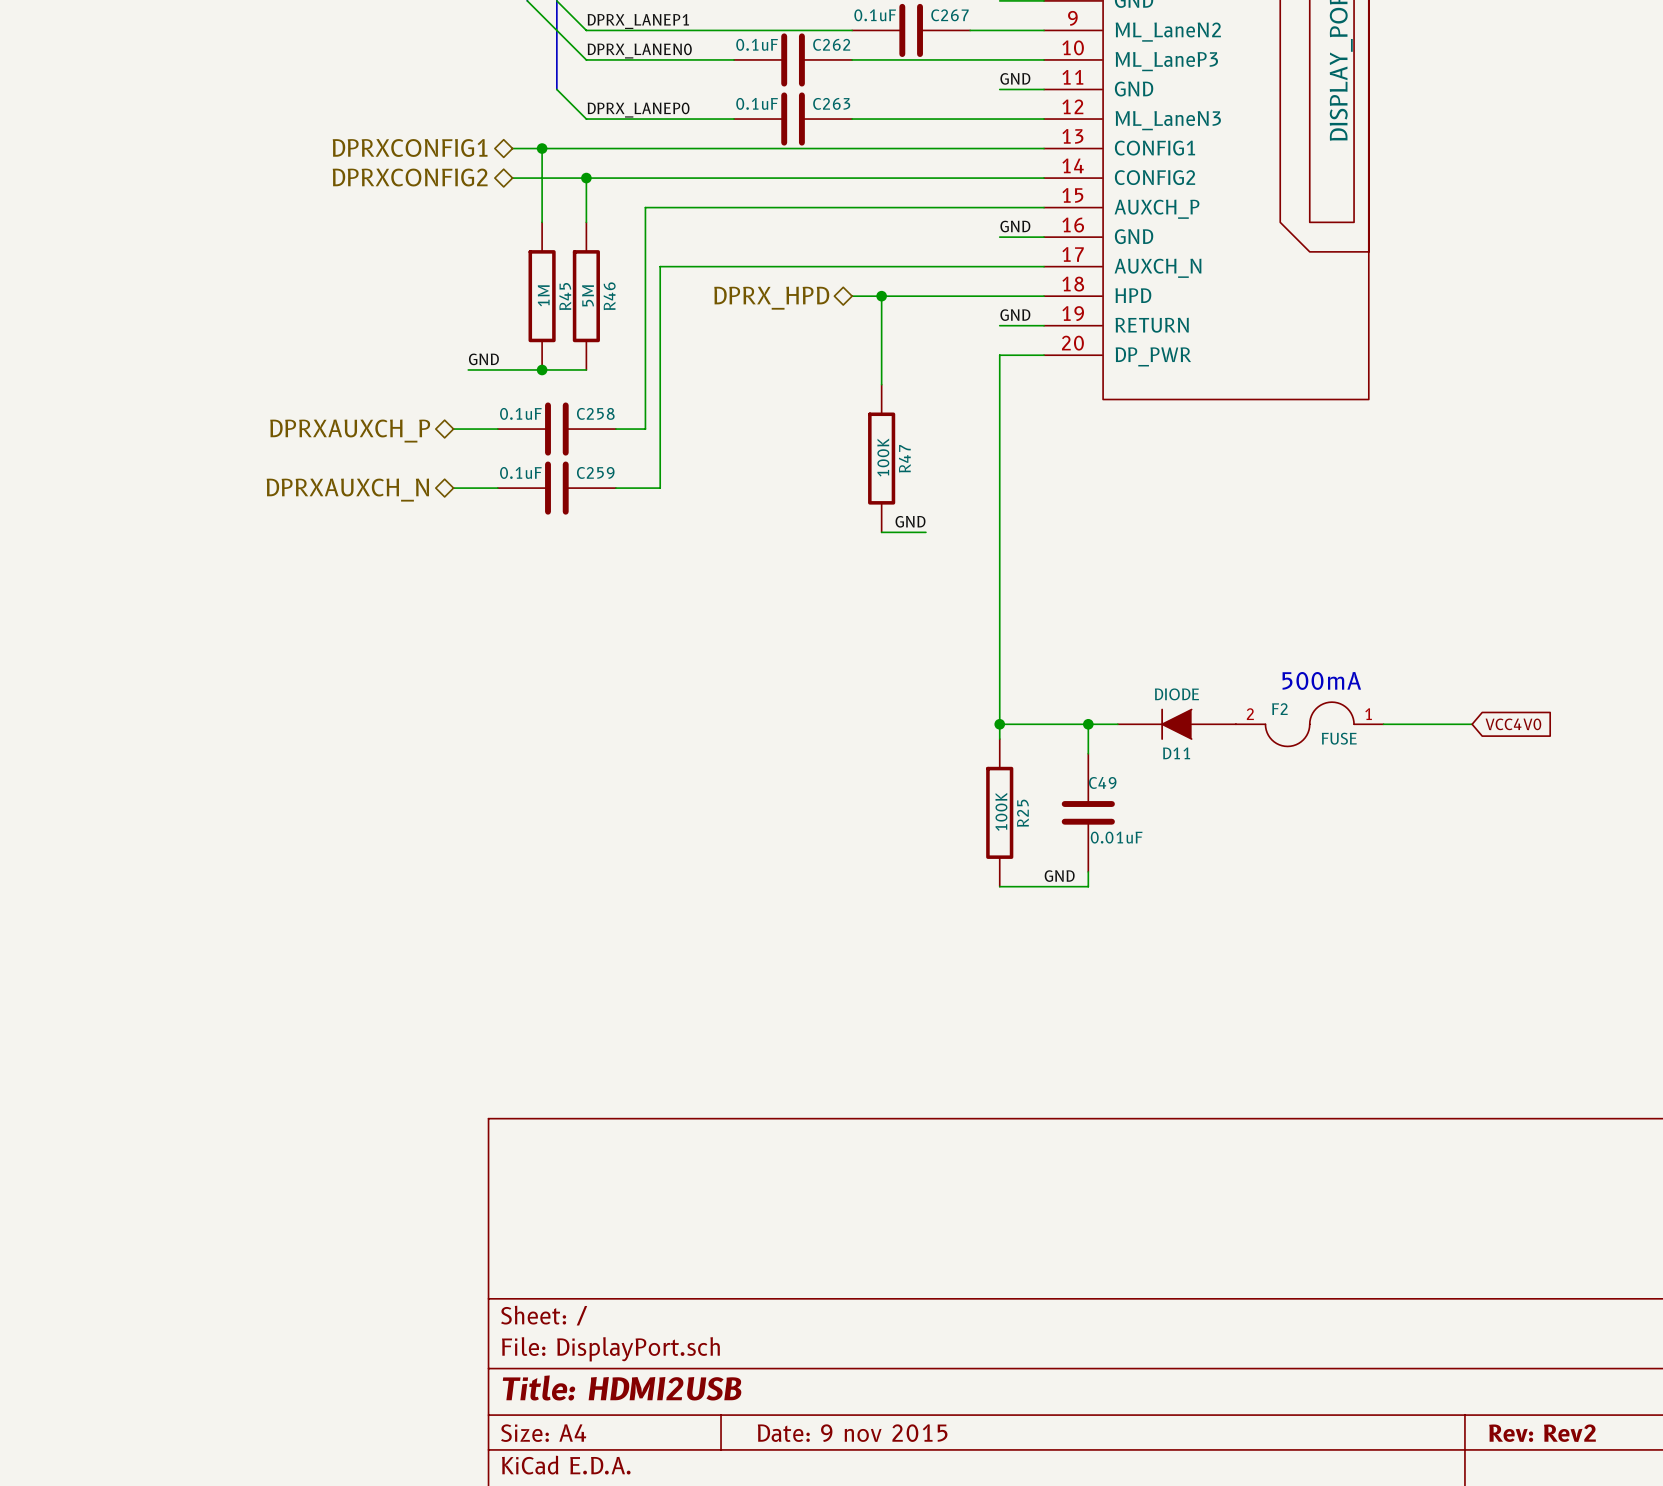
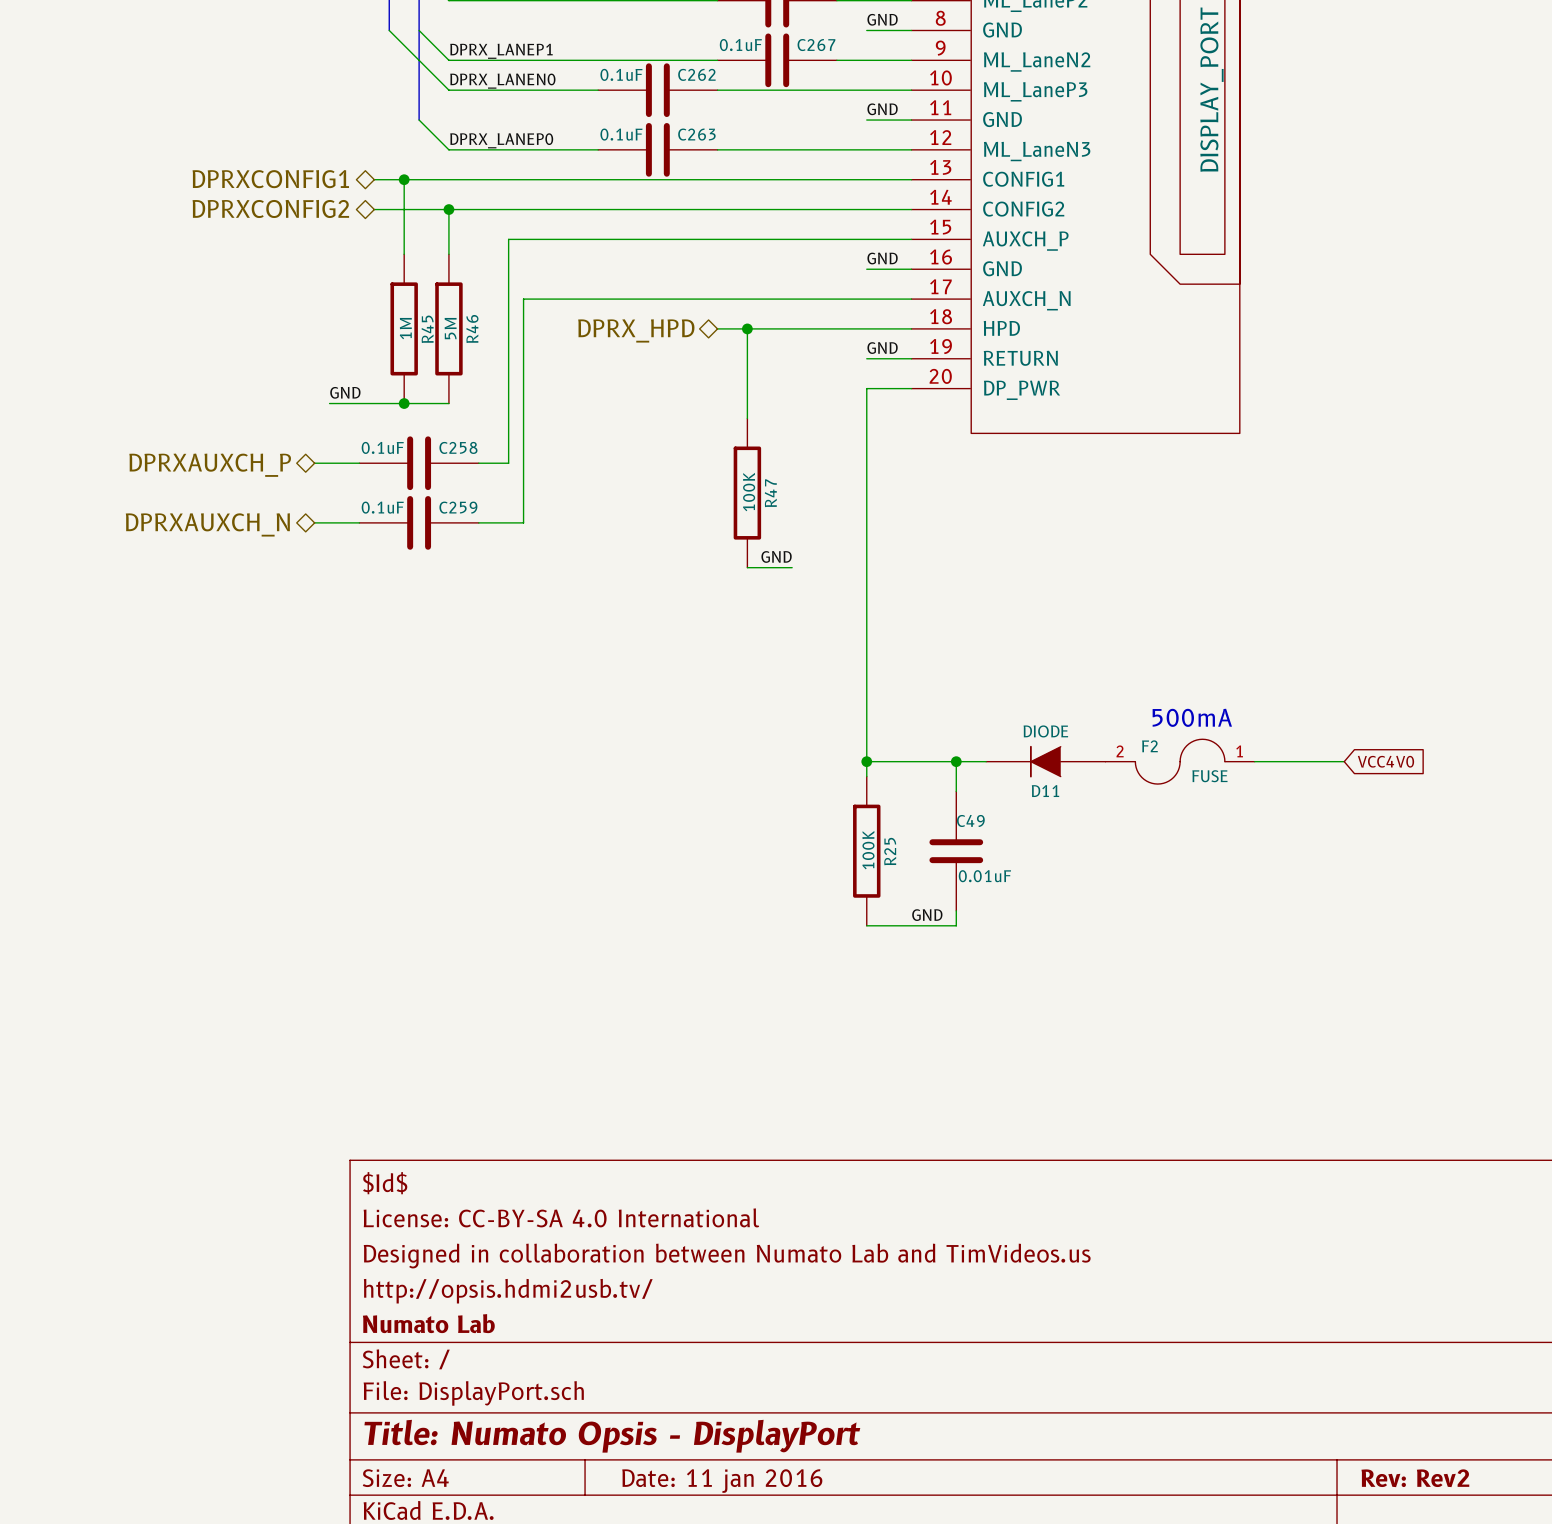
title block: none -> $Id$ (385, 1183)
title block: none -> License: CC-BY-SA 4.0 International (561, 1217)
title block: none -> Designed in collaboration between Numato Lab and TimVideos.us (727, 1256)
title block: none -> http://opsis.hdmi2usb.tv/ (508, 1291)
title block: none -> Numato Lab (428, 1323)
title block: Title: HDMI2USB (622, 1387) -> Title: Numato Opsis - DisplayPort (612, 1436)
title block: Date: 9 nov 2015 (852, 1433) -> Date: 11 jan 2016 (722, 1481)

